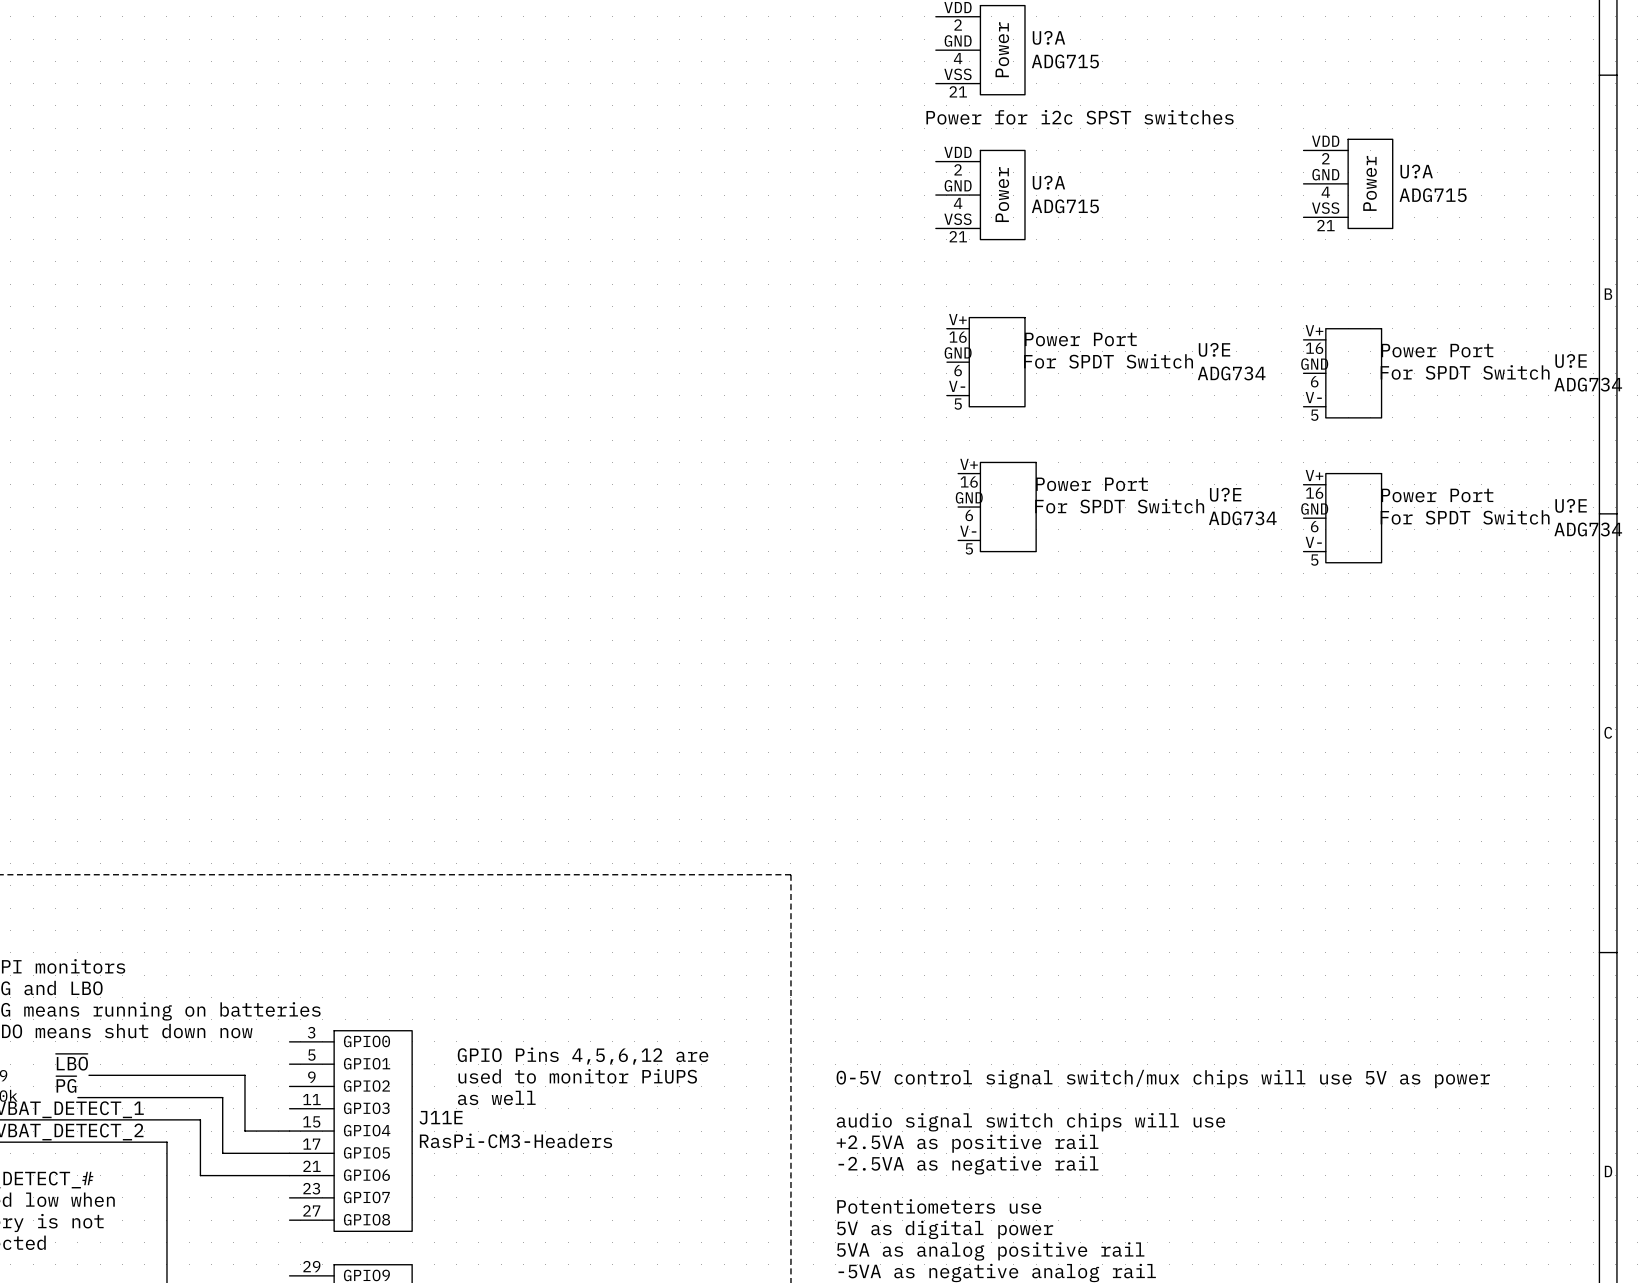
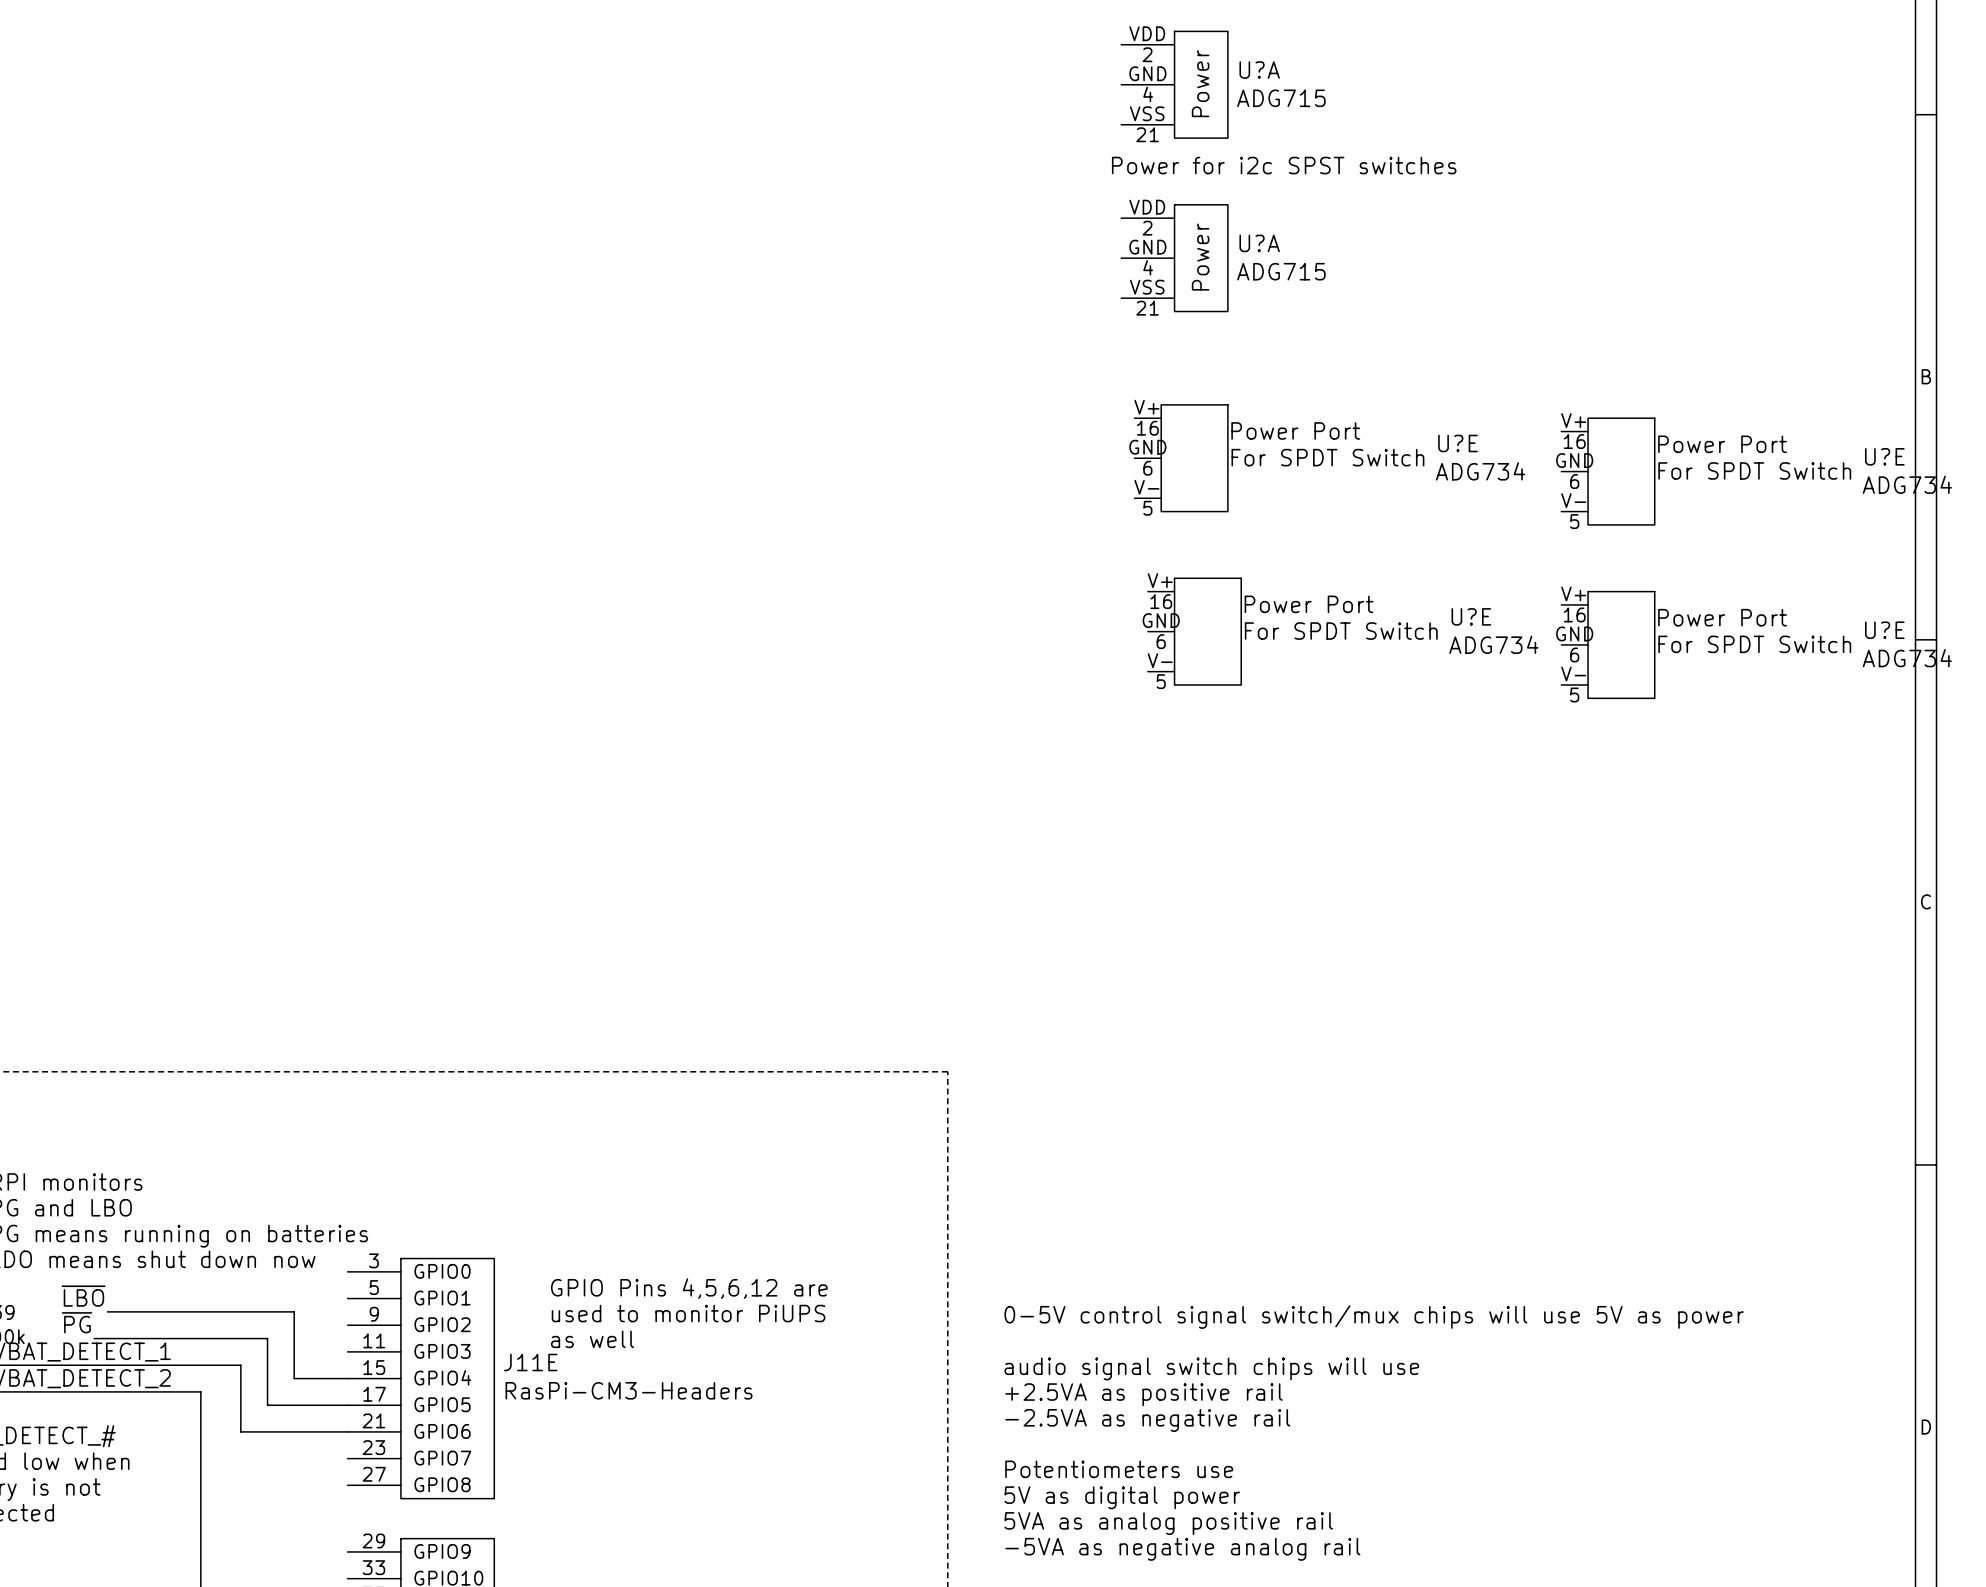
U?A: ADG715 (1348, 183) -> none

